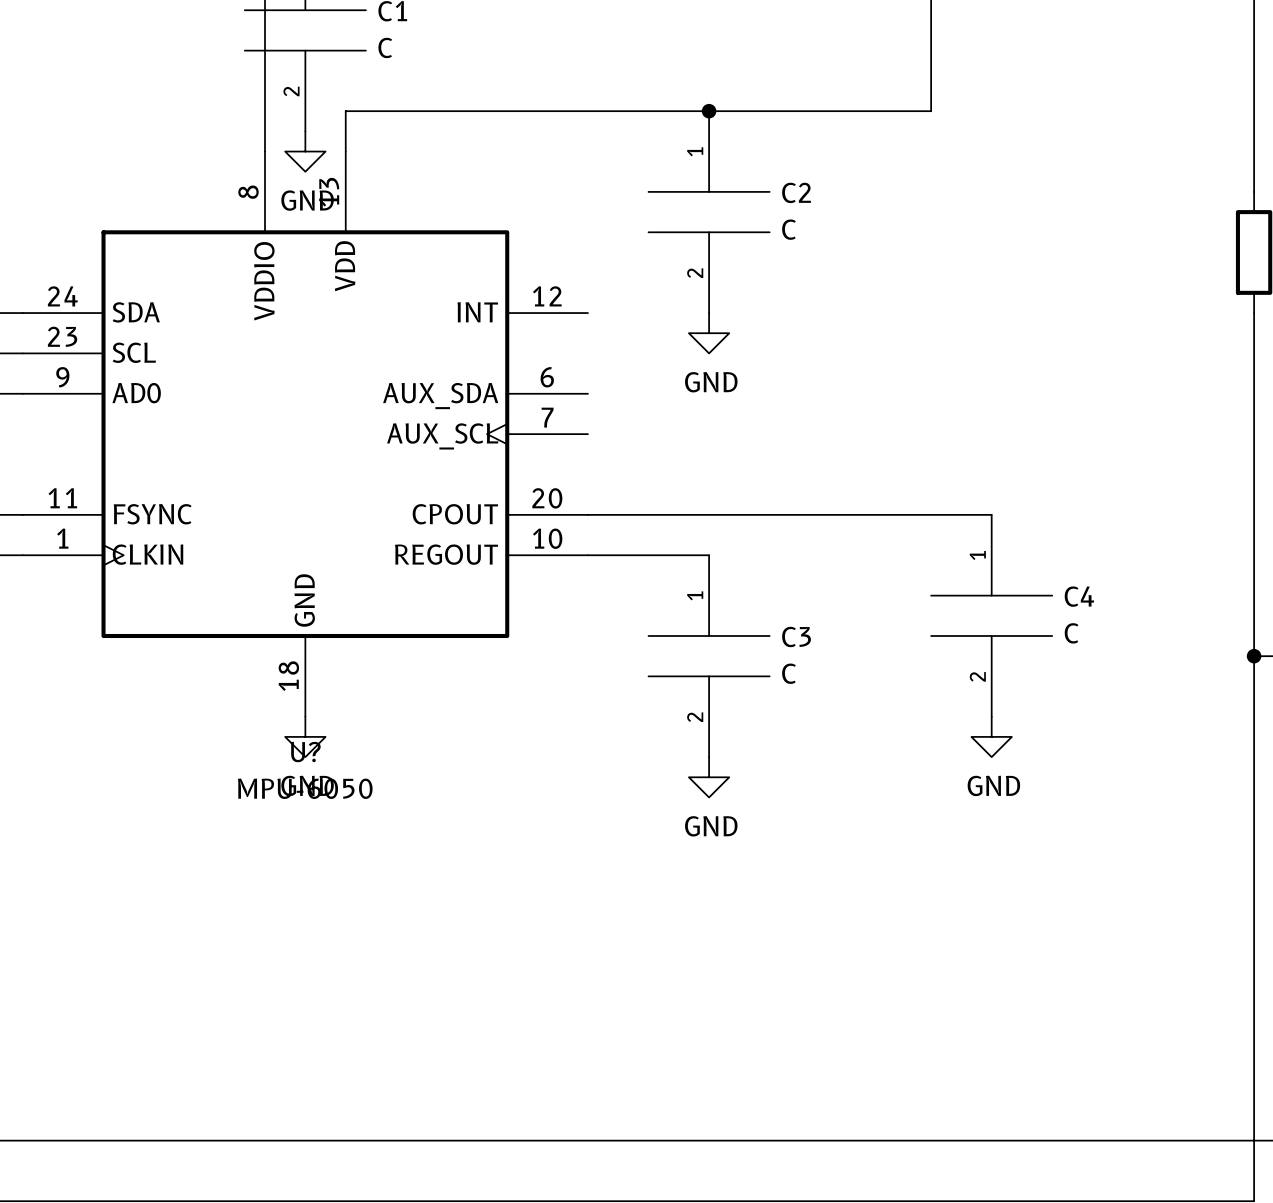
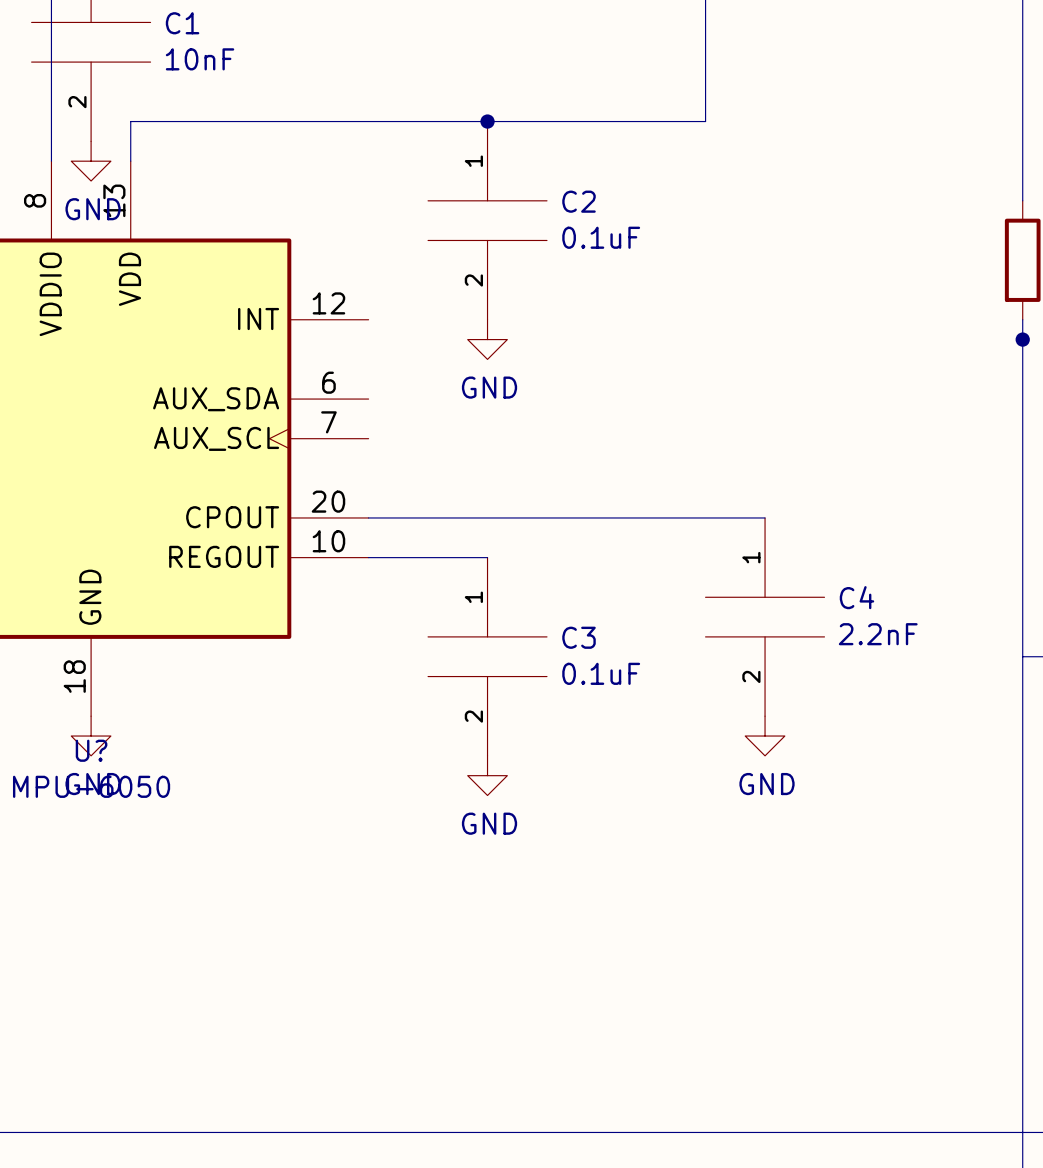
C1 value: C (385, 47) -> 10nF (200, 59)
C2 value: C (788, 229) -> 0.1uF (601, 237)
junction: none -> (1022, 339)
C4 value: C (1071, 633) -> 2.2nF (878, 634)
junction: (1254, 656) -> none
C3 value: C (788, 673) -> 0.1uF (601, 673)

